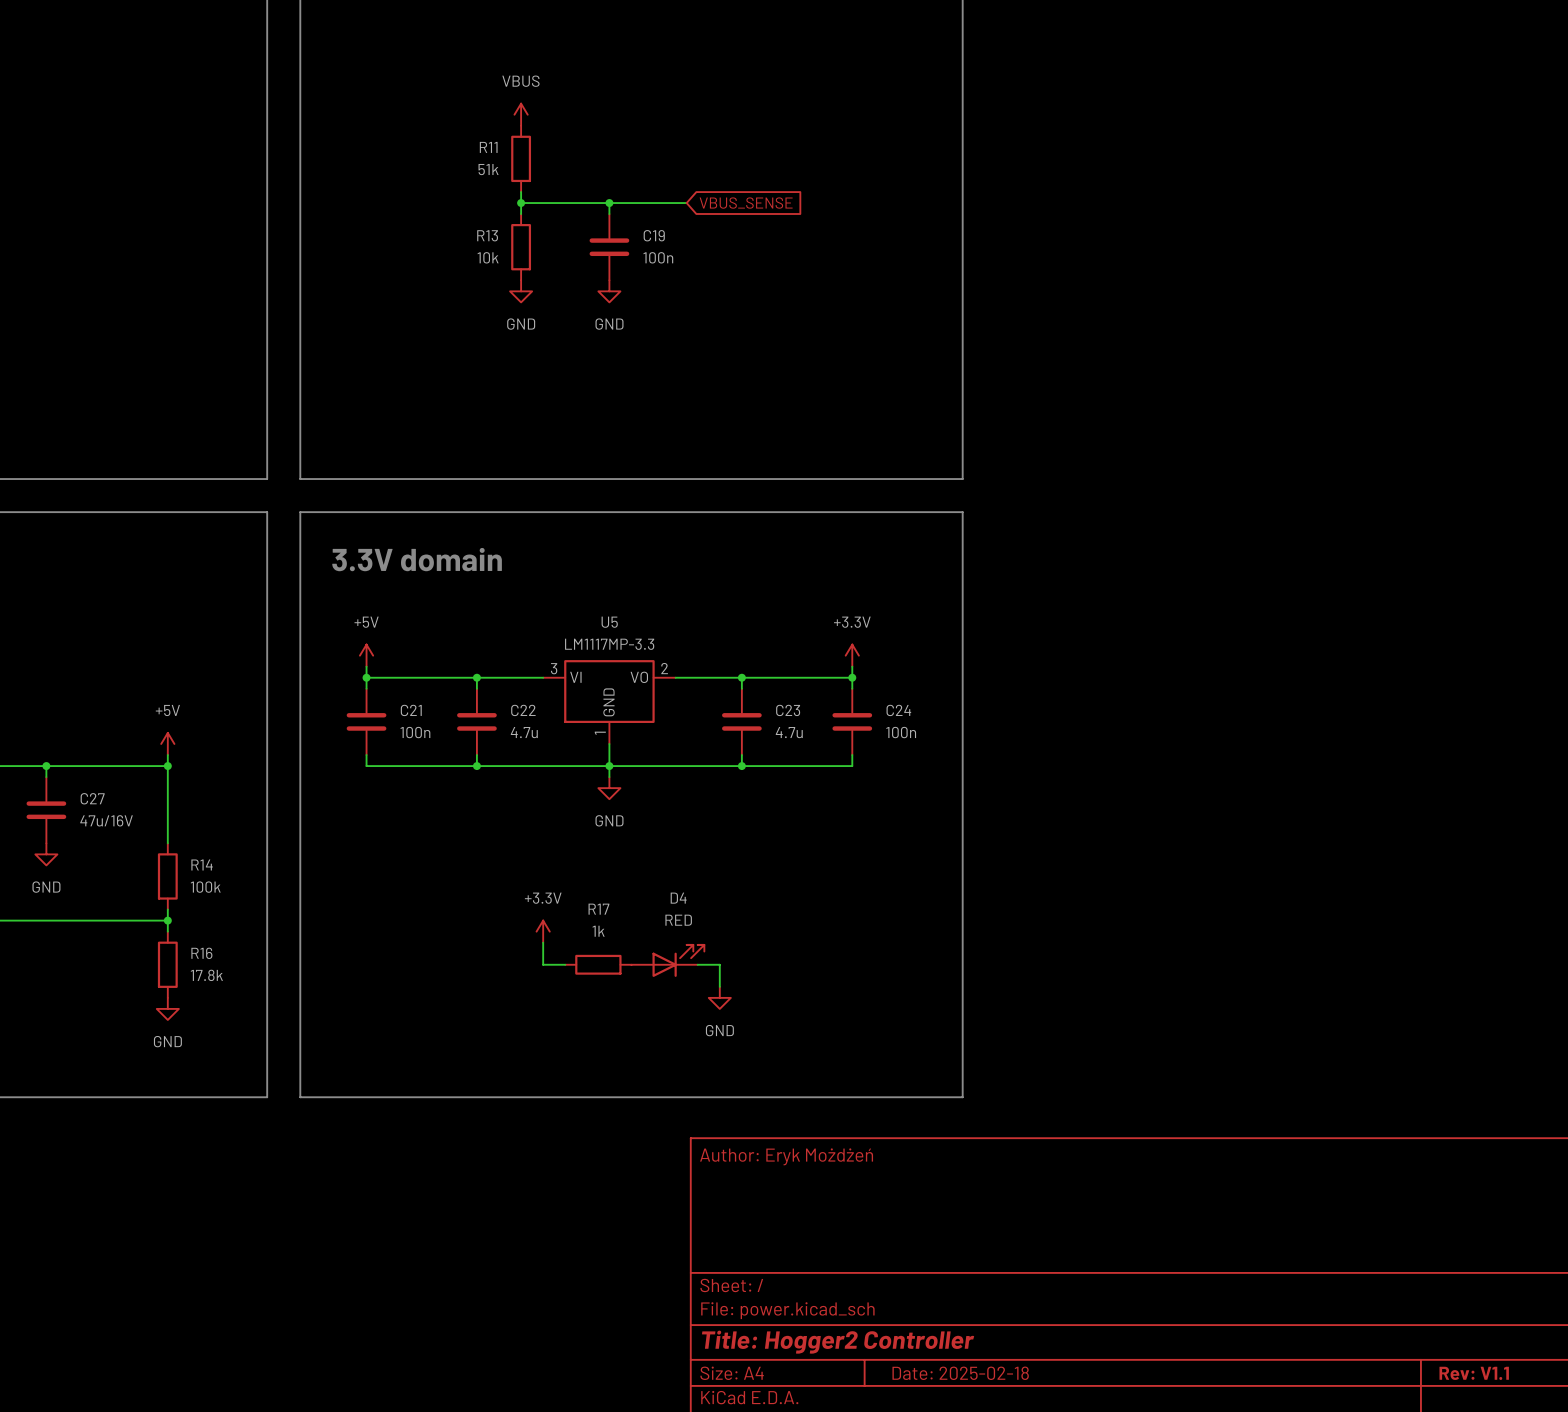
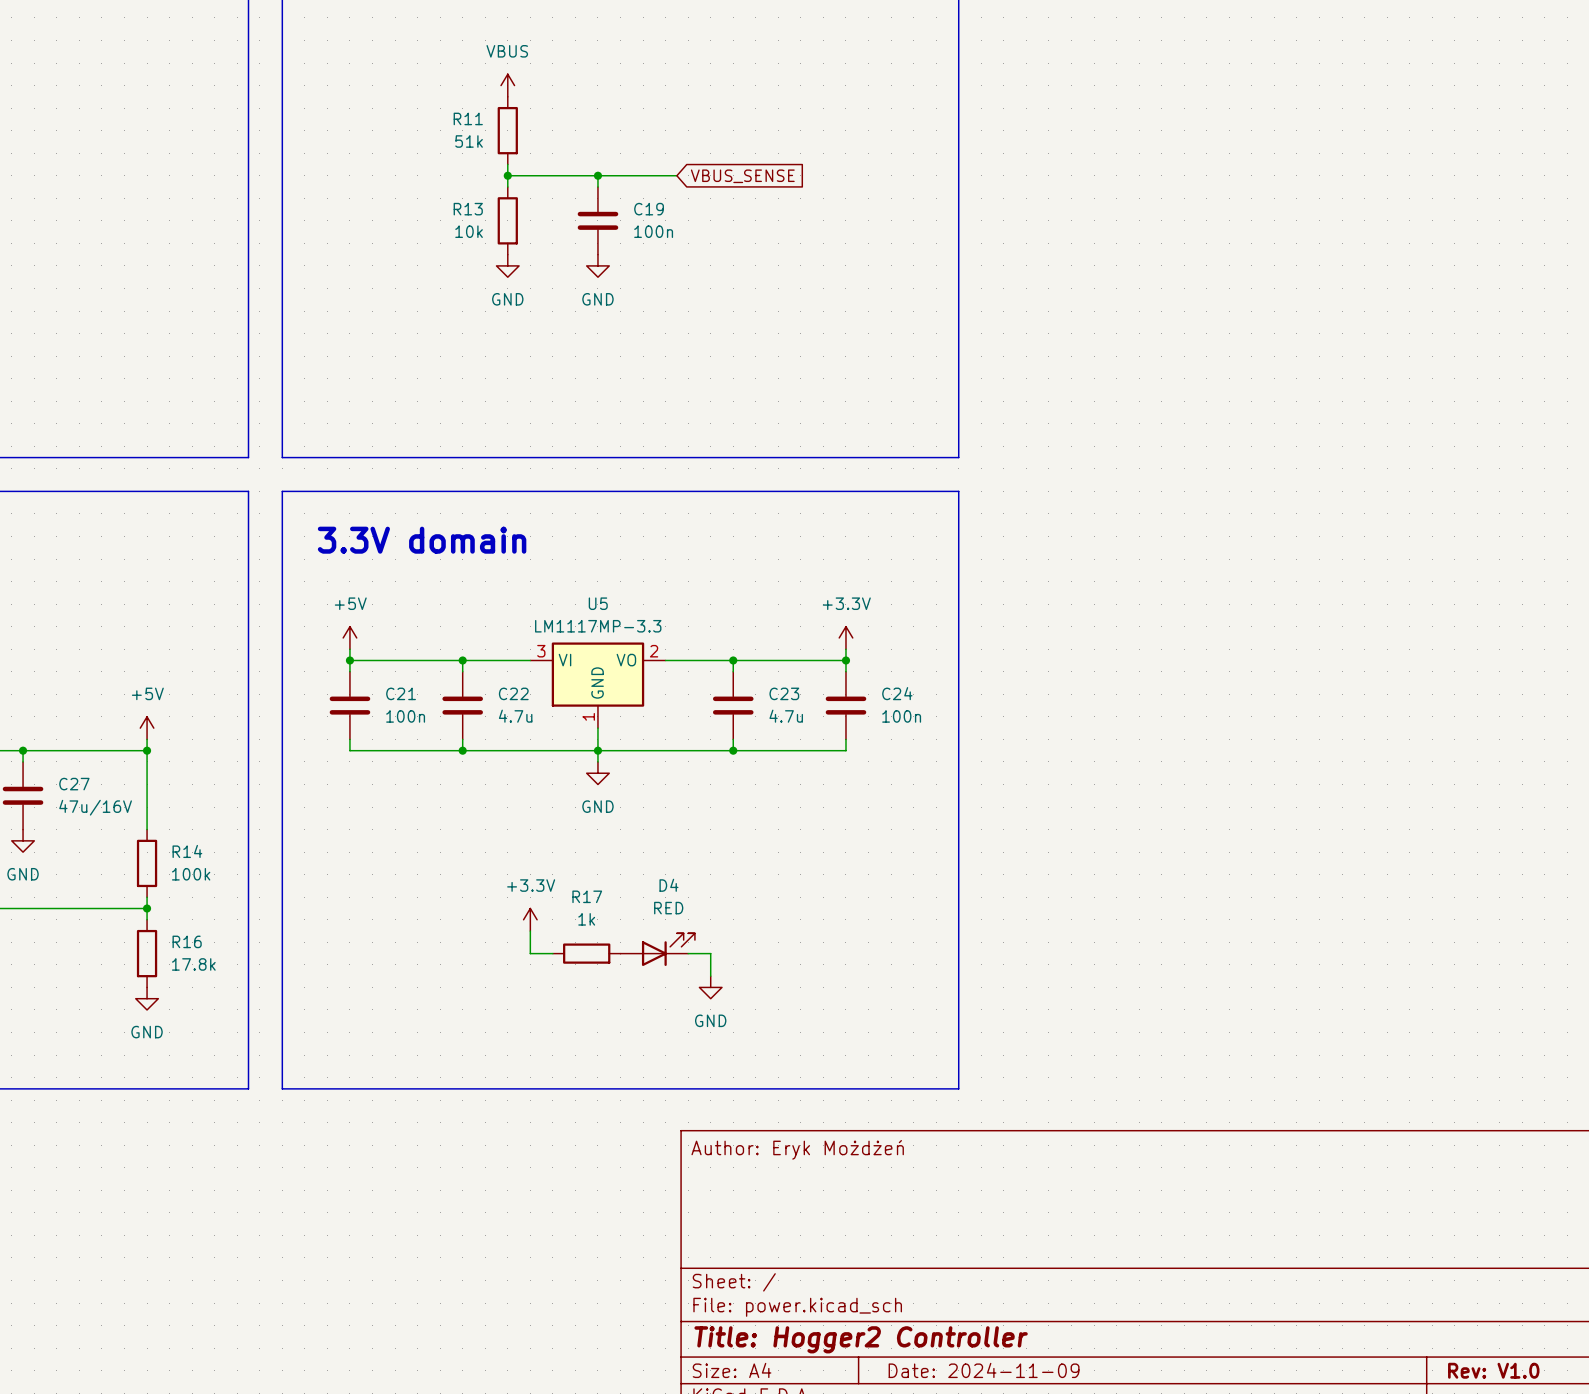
title block: Date: 2025-02-18 (960, 1373) -> Date: 2024-11-09 (984, 1370)
title block: Rev: V1.1 (1474, 1373) -> Rev: V1.0 (1493, 1370)

